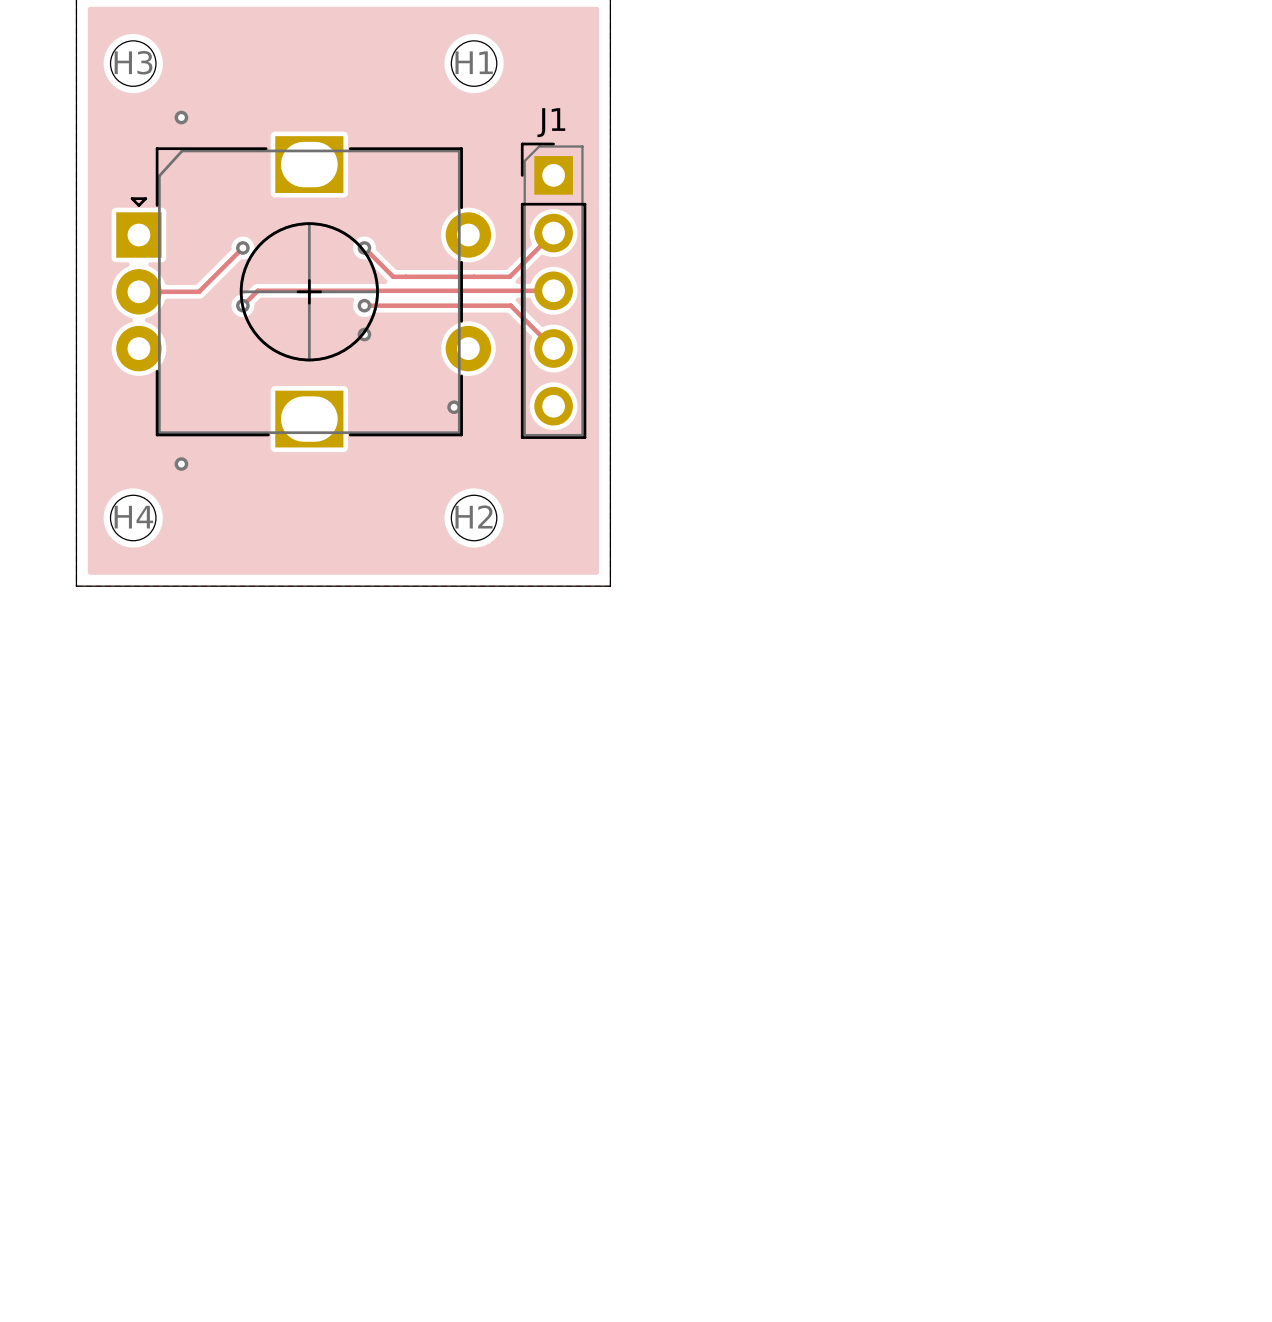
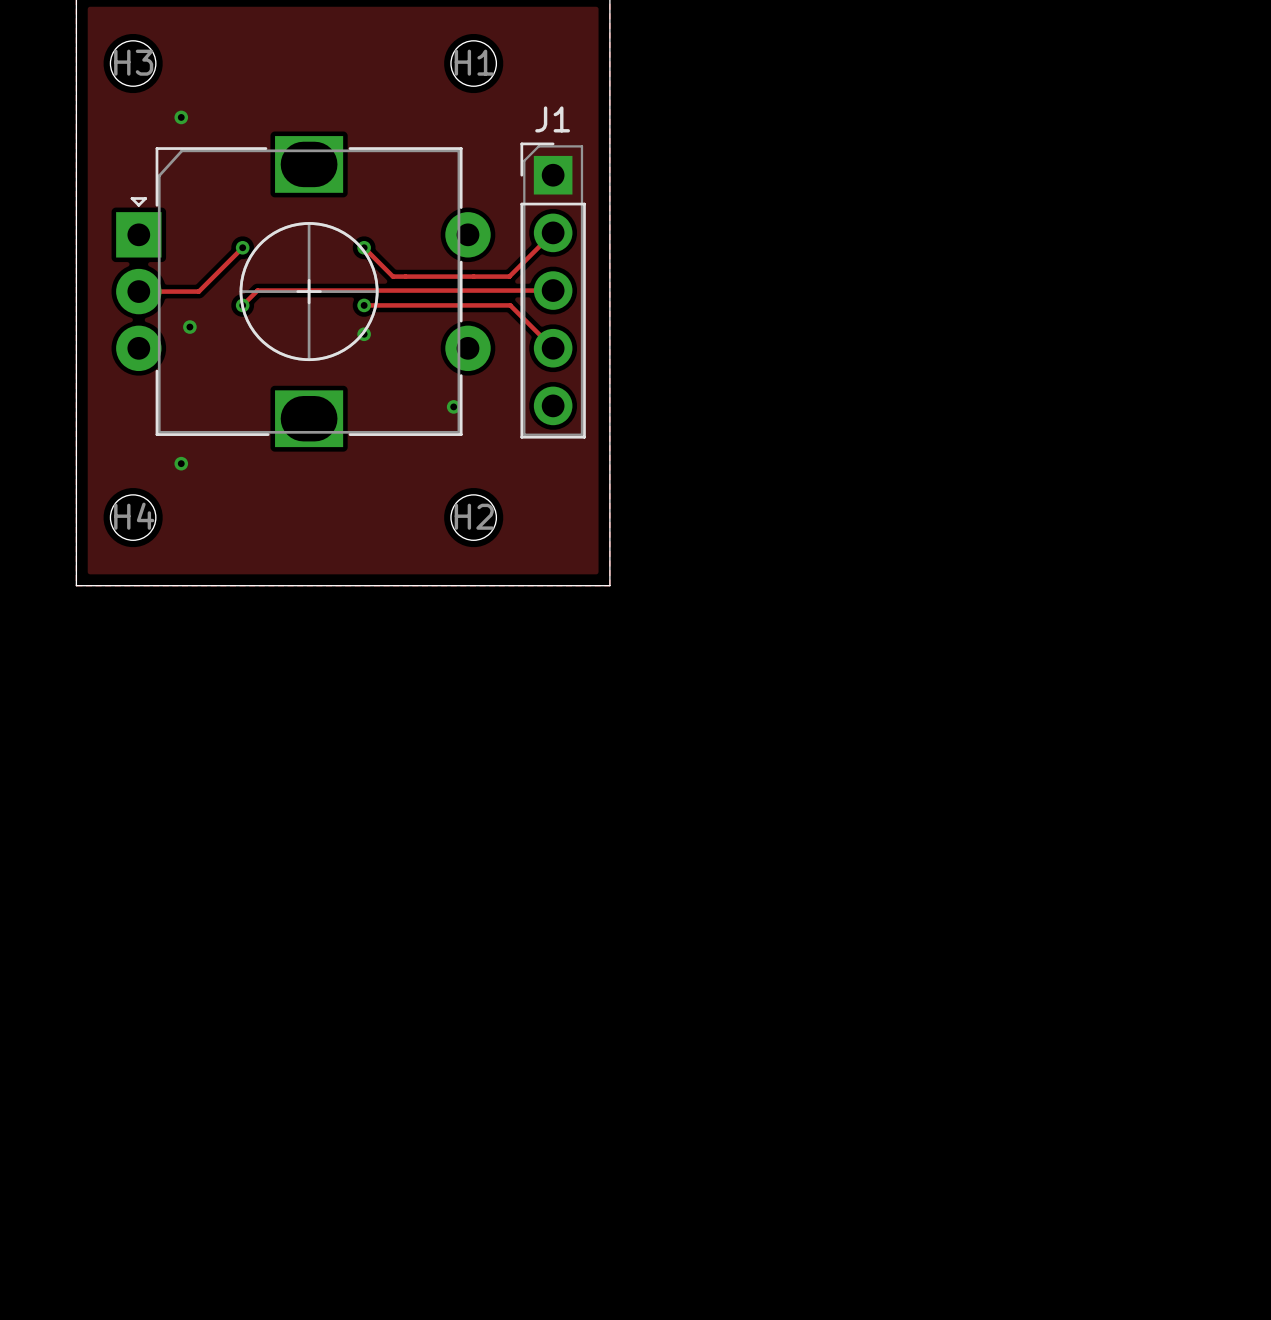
via: none -> (189, 327)

